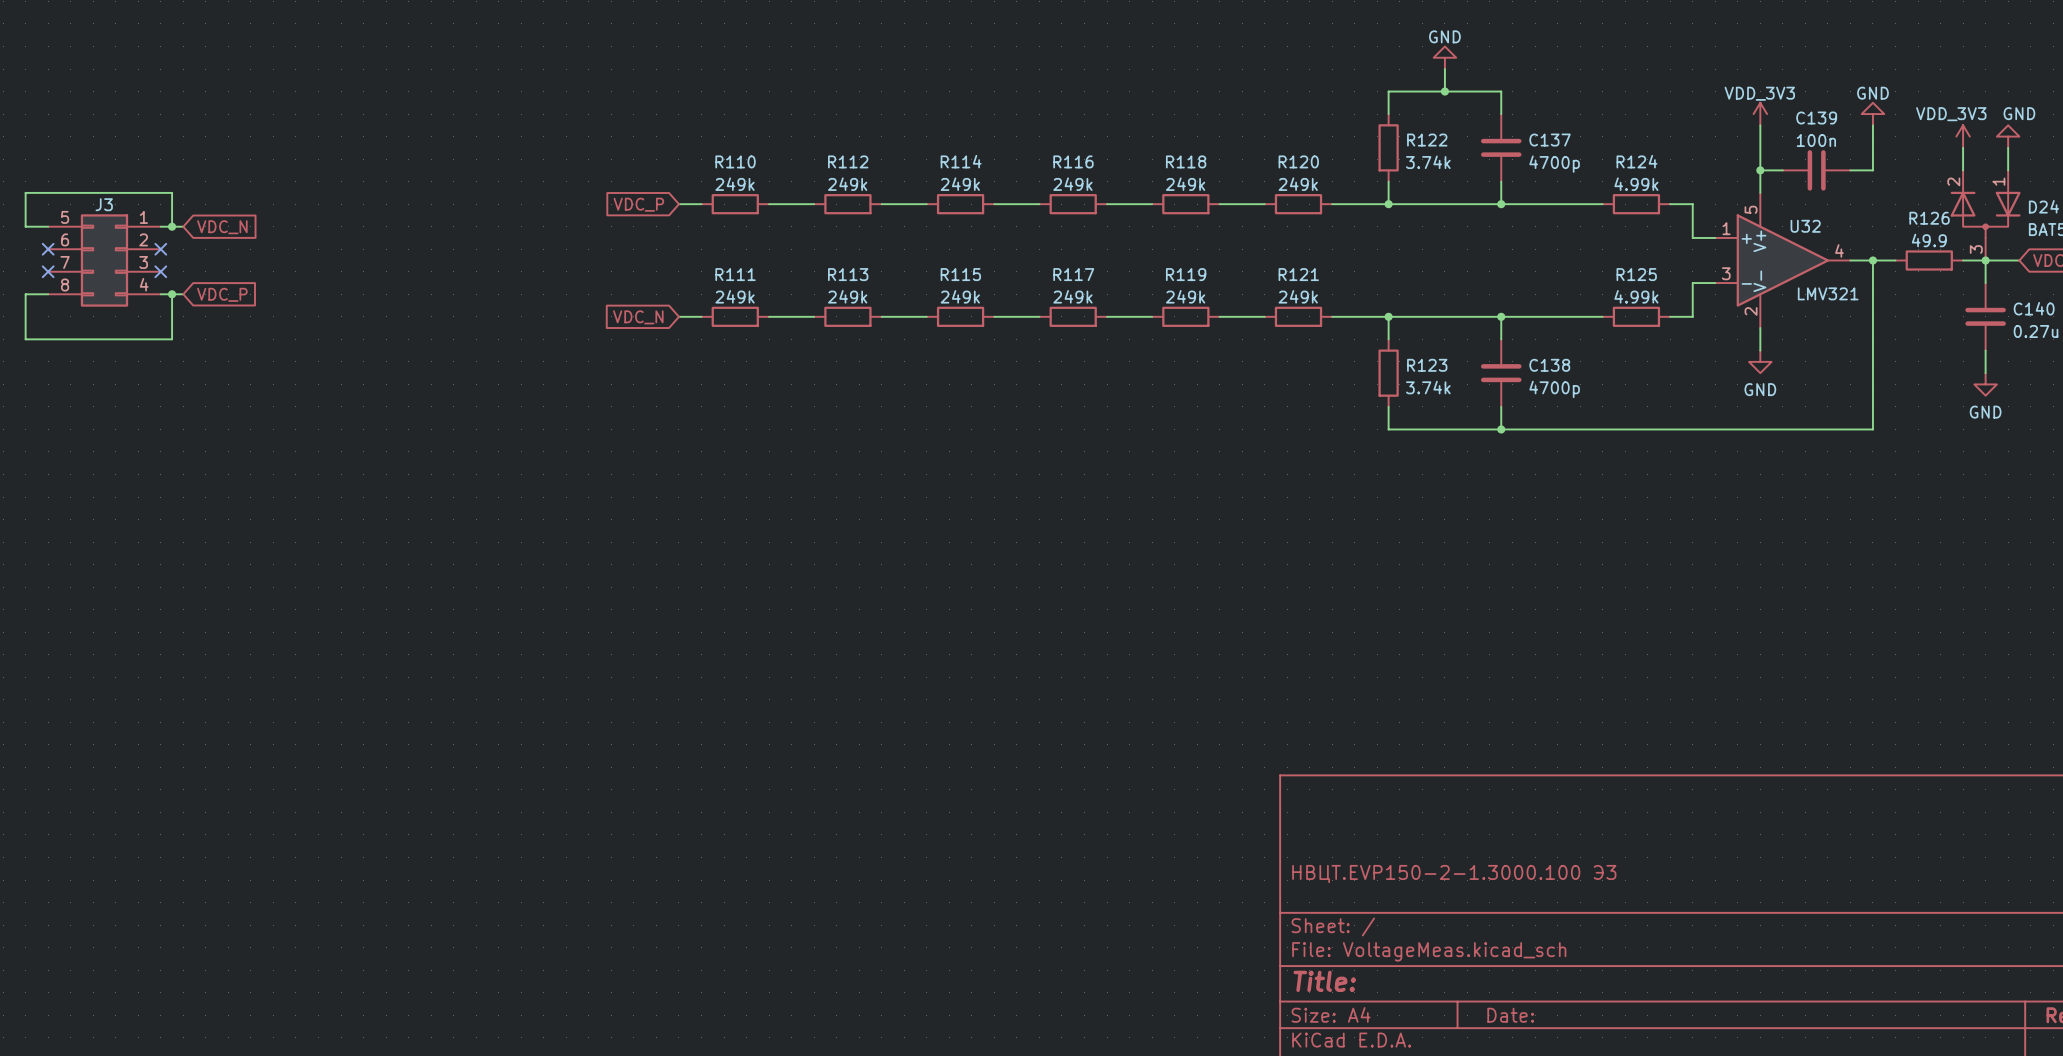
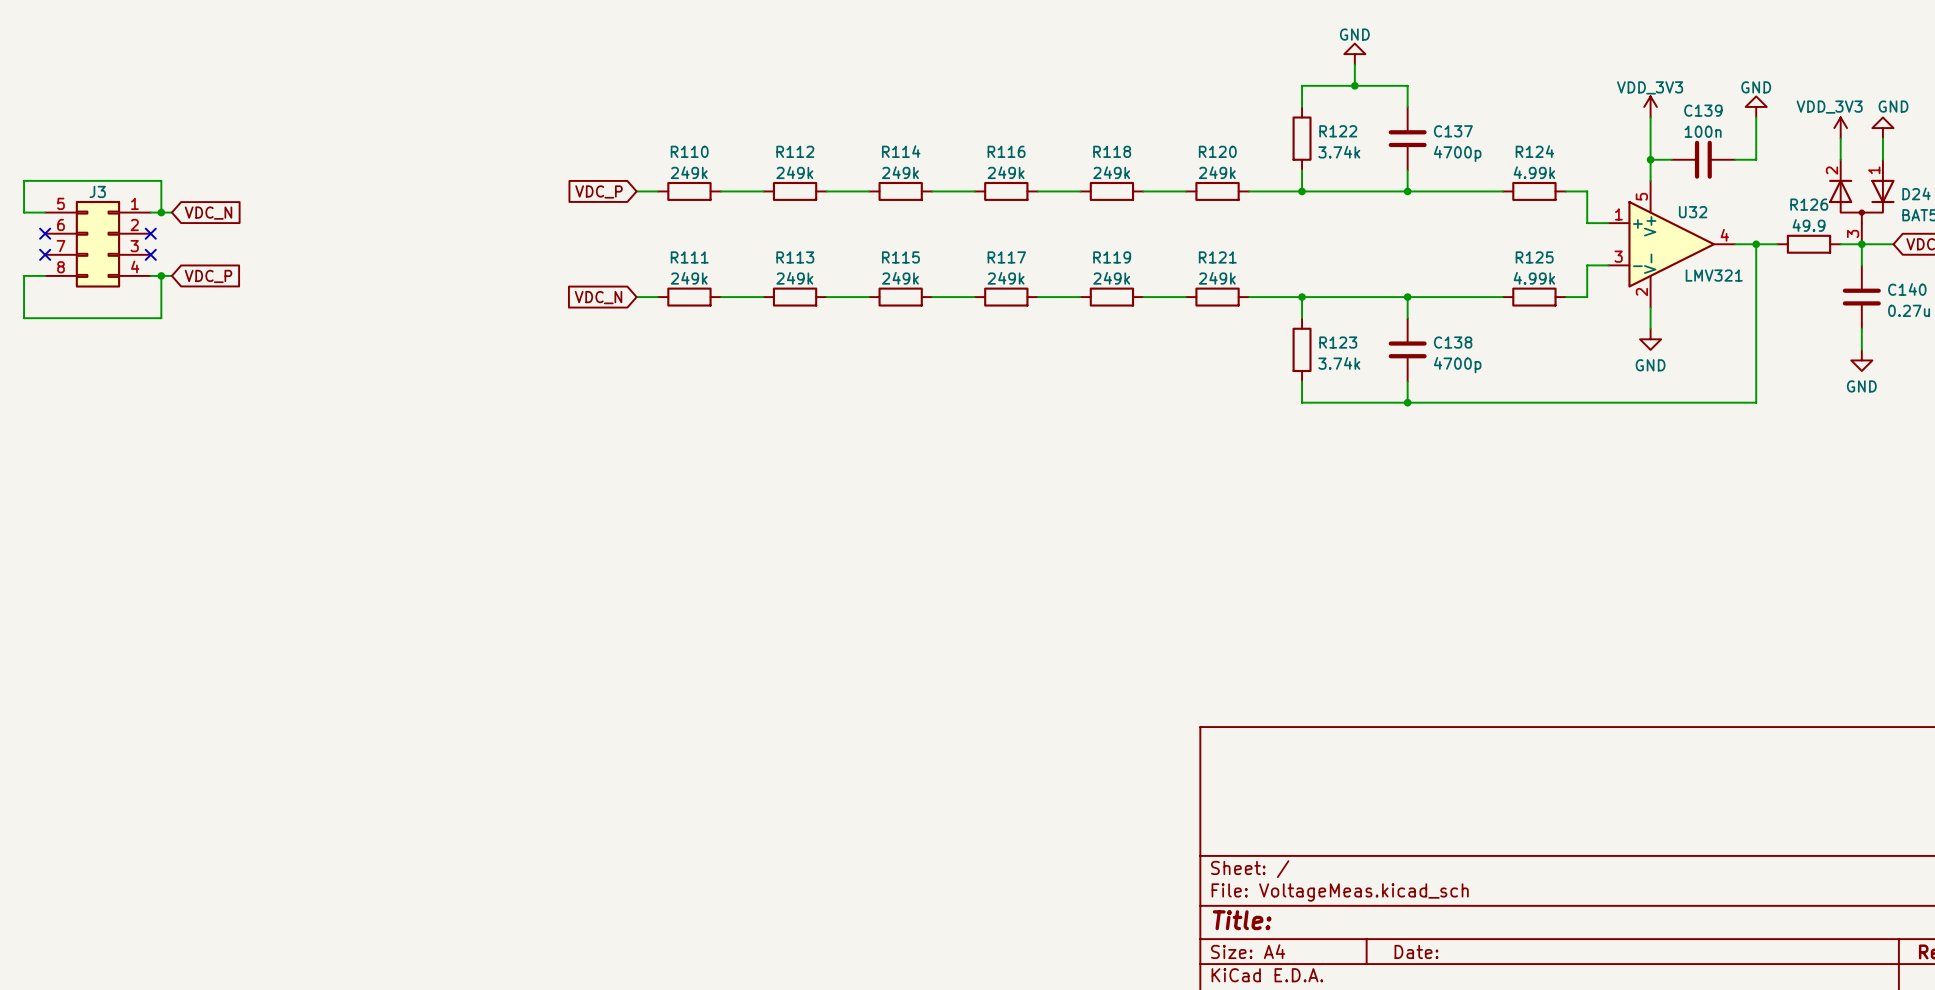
title block: НВЦТ.EVP150-2-1.3000.100 Э3 (1454, 874) -> none

